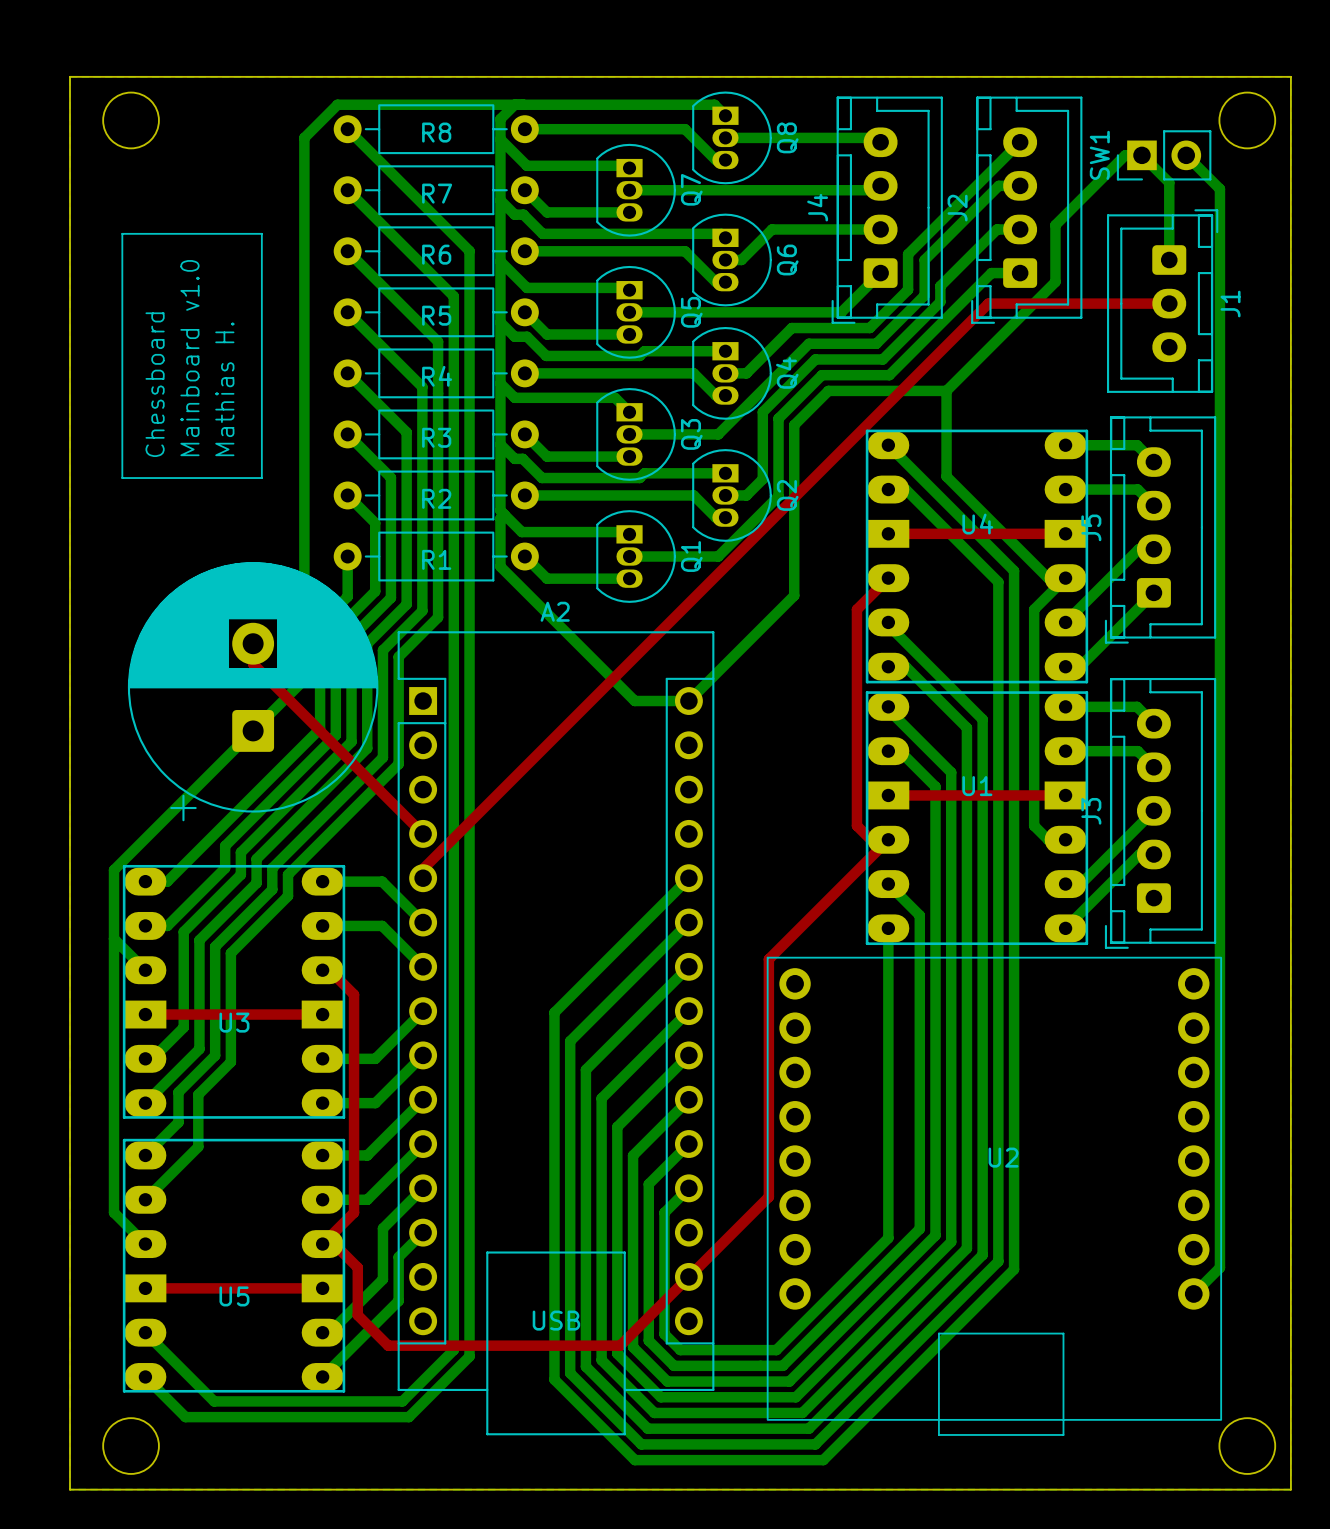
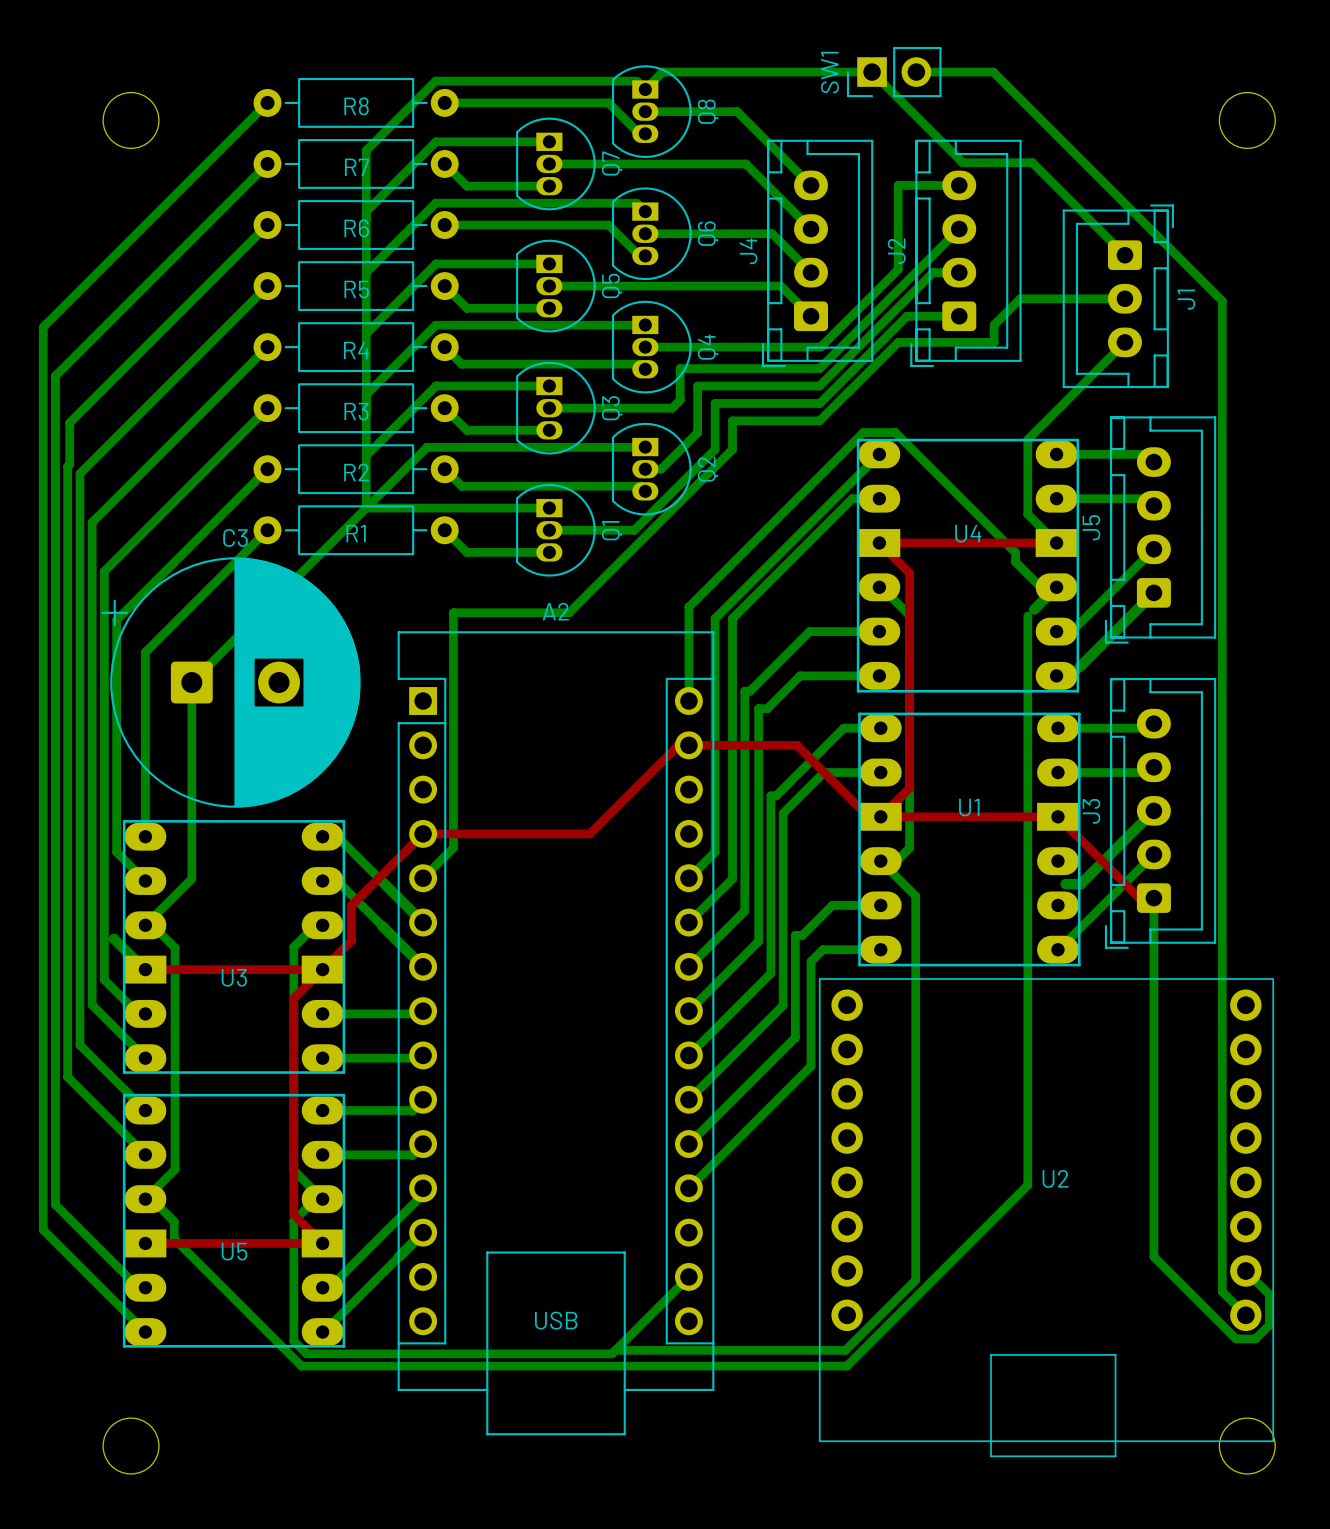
bottom track: none -> (872, 72) (962, 162) (1032, 162) (1124, 255)
bottom track: none -> (880, 72) (662, 72) (645, 89) (636, 81) (435, 81) (366, 150) (366, 333)
bottom track: none -> (916, 72) (993, 72) (1222, 300) (1222, 1291) (1245, 1315)
board edge: (70, 76) (1290, 76) (1290, 1489) (70, 1489) (70, 76) -> none
bottom track: none -> (444, 102) (608, 102) (639, 133) (645, 133)
bottom track: (514, 104) (500, 119) (500, 510) (521, 532) (627, 532) (629, 534) -> none
bottom track: none -> (645, 111) (737, 111) (811, 185)
bottom track: (725, 115) (714, 104) (337, 104) (304, 137) (304, 679) (114, 870) (114, 1212) (145, 1244) -> none
bottom track: (347, 129) (469, 251) (469, 1356) (408, 1417) (185, 1417) (145, 1376) -> none
R8 position: (436, 129) -> (356, 102)
bottom track: (524, 129) (685, 129) (715, 160) (725, 160) -> none
bottom track: (725, 137) (876, 137) (880, 142) -> none
Q8 position: (732, 137) -> (651, 111)
bottom track: (500, 139) (526, 165) (627, 165) (629, 168) -> none
bottom track: none -> (549, 141) (436, 141) (366, 211)
bottom track: (1020, 142) (908, 254) (908, 289) (869, 328) (791, 328) (746, 373) (725, 373) -> none
SW1 position: (1164, 155) -> (894, 72)
bottom track: (1186, 155) (1219, 189) (1219, 1267) (1193, 1293) -> none
bottom track: none -> (267, 163) (55, 375) (55, 1204) (138, 1287) (145, 1287)
bottom track: none -> (549, 163) (745, 163) (811, 229)
bottom track: (880, 185) (876, 190) (629, 190) -> none
bottom track: none -> (959, 185) (898, 185) (898, 269) (820, 347) (645, 347)
bottom track: (1020, 185) (998, 185) (924, 260) (924, 295) (876, 343) (808, 343) (718, 434) (629, 434) -> none
bottom track: (347, 190) (453, 296) (453, 1350) (402, 1401) (214, 1401) (145, 1332) -> (267, 102) (43, 327) (43, 1229) (145, 1332)
R7 position: (436, 190) -> (356, 163)
bottom track: (524, 190) (547, 212) (629, 212) -> (444, 163) (466, 186) (549, 186)
Q7 position: (636, 190) -> (555, 163)
bottom track: (500, 200) (514, 214) (523, 214) (542, 233) (721, 233) (725, 237) -> none
J4 position: (887, 210) -> (817, 253)
J2 position: (1026, 210) -> (965, 253)
bottom track: none -> (645, 211) (636, 203) (435, 203) (366, 272)
bottom track: none -> (444, 225) (608, 225) (639, 255) (645, 255)
bottom track: (880, 229) (772, 229) (741, 260) (725, 260) -> none
bottom track: none -> (959, 229) (819, 368) (680, 368) (680, 400) (672, 408) (549, 408)
bottom track: (1020, 229) (997, 229) (940, 286) (940, 302) (882, 359) (815, 359) (762, 412) (762, 479) (746, 495) (725, 495) -> none
line: (122, 233) (261, 233) (261, 478) (122, 478) (122, 233) -> none
bottom track: none -> (645, 233) (772, 233) (811, 272)
bottom track: (347, 251) (438, 341) (438, 617) (398, 656) (398, 764) (288, 874) (288, 896) (230, 953) (230, 1062) (198, 1094) (198, 1146) (145, 1199) (150, 1199) -> none
R6 position: (436, 251) -> (356, 225)
bottom track: (524, 251) (685, 251) (715, 282) (725, 282) -> none
Q6 position: (732, 260) -> (651, 233)
bottom track: (1169, 260) (1169, 182) (1141, 155) (1125, 155) (1055, 225) (1055, 281) (946, 390) -> none
bottom track: (500, 261) (526, 287) (627, 287) (629, 290) -> none
bottom track: none -> (549, 263) (436, 263) (366, 333) (366, 508) (549, 508)
bottom track: none -> (959, 272) (933, 272) (819, 386) (697, 386) (697, 432) (661, 469) (645, 469)
bottom track: (880, 273) (841, 312) (629, 312) -> none
bottom track: (1020, 273) (991, 273) (889, 375) (821, 375) (778, 418) (778, 496) (718, 556) (629, 556) -> none
bottom track: none -> (267, 286) (79, 473) (79, 1045) (145, 1110)
bottom track: none -> (549, 286) (780, 286) (811, 316)
bottom track: none -> (1124, 298) (1020, 298) (994, 324) (994, 342) (898, 342) (819, 420) (732, 420) (732, 449) (569, 612) (453, 612) (453, 847) (423, 878)
J1 position: (1162, 301) -> (1118, 296)
top track: (1169, 303) (988, 303) (423, 868) (423, 878) -> none
bottom track: (347, 312) (422, 387) (422, 610) (382, 650) (382, 757) (272, 868) (272, 889) (215, 946) (215, 1055) (178, 1092) (178, 1122) (145, 1155) -> (267, 225) (69, 422) (69, 464) (67, 466) (67, 1077) (145, 1154)
R5 position: (436, 312) -> (356, 286)
bottom track: (524, 312) (547, 334) (629, 334) -> (444, 286) (466, 308) (549, 308)
Q5 position: (636, 312) -> (555, 286)
bottom track: none -> (959, 316) (906, 316) (819, 403) (715, 403) (715, 449) (634, 530) (549, 530)
bottom track: (500, 322) (514, 336) (527, 336) (546, 355) (639, 355) (644, 351) (725, 351) -> none
bottom track: none -> (645, 324) (435, 325) (366, 394)
bottom track: none -> (1124, 342) (1027, 439) (1027, 514) (1056, 542)
bottom track: none -> (444, 347) (461, 364) (640, 364) (645, 369)
text: Mainboard v1.0 (189, 358) -> none
bottom track: (347, 373) (406, 432) (406, 604) (367, 643) (367, 748) (256, 859) (256, 883) (199, 940) (199, 1049) (145, 1103) -> none
R4 position: (436, 373) -> (356, 347)
bottom track: (524, 373) (693, 373) (715, 395) (725, 395) -> none
Q4 position: (732, 373) -> (651, 347)
bottom track: (500, 383) (514, 397) (615, 397) (629, 412) -> none
text: Chessboard (155, 384) -> none
bottom track: none -> (549, 386) (436, 386) (366, 455)
text: Mathias H. (224, 389) -> none
bottom track: (946, 390) (828, 390) (794, 425) (794, 595) (688, 701) (634, 701) (500, 566) (500, 518) (504, 514) -> none
bottom track: (946, 390) (946, 476) (1048, 578) (1065, 578) -> none
bottom track: none -> (267, 408) (104, 571) (104, 979) (138, 1013) (145, 1013)
bottom track: (347, 434) (390, 477) (390, 597) (351, 637) (351, 741) (240, 852) (240, 874) (183, 931) (183, 1027) (152, 1058) (145, 1058) -> (267, 347) (92, 522) (92, 1004) (145, 1058)
R3 position: (436, 434) -> (356, 408)
bottom track: (524, 434) (547, 456) (629, 456) -> (444, 408) (466, 430) (549, 430)
Q3 position: (636, 434) -> (555, 408)
bottom track: (500, 444) (514, 458) (522, 458) (541, 478) (639, 478) (644, 473) (725, 473) -> none
bottom track: (888, 445) (1014, 570) (1014, 1269) (823, 1460) (634, 1460) (554, 1379) (554, 1012) (688, 878) -> (879, 454) (715, 618) (715, 852) (688, 878)
bottom track: (1065, 445) (1137, 445) (1146, 454) -> (1056, 454) (1146, 454)
bottom track: none -> (645, 447) (426, 447) (191, 682) (191, 878) (145, 925) (152, 925) (175, 947) (175, 1169) (145, 1199) (151, 1199) (174, 1221) (174, 1238) (301, 1366) (846, 1366) (1027, 1185) (1027, 616)
bottom track: none -> (444, 469) (461, 486) (640, 486) (645, 491)
bottom track: (888, 489) (905, 489) (998, 582) (998, 1261) (815, 1444) (641, 1444) (570, 1373) (570, 1041) (688, 922) -> (879, 498) (852, 498) (732, 618) (732, 878) (688, 922)
bottom track: (1065, 489) (1137, 489) (1146, 498) -> (1056, 498) (1146, 498)
bottom track: (347, 495) (375, 523) (375, 591) (335, 630) (335, 735) (225, 846) (225, 868) (167, 925) (145, 925) -> none
R2 position: (436, 495) -> (356, 469)
bottom track: (524, 495) (693, 495) (715, 517) (725, 517) -> none
Q2 position: (732, 495) -> (651, 469)
bottom track: none -> (267, 530) (145, 652) (145, 836)
top track: (888, 533) (1065, 533) -> none
top track: none -> (1056, 542) (879, 542) (909, 573) (909, 788) (880, 816)
bottom track: (1153, 549) (1138, 549) (1065, 622) -> (1153, 549) (1071, 631) (1056, 631)
bottom track: (347, 556) (347, 596) (320, 624) (320, 728) (167, 881) (145, 881) -> (267, 469) (116, 620) (116, 852) (145, 881)
R1 position: (436, 556) -> (356, 530)
bottom track: (524, 556) (547, 578) (629, 578) -> (444, 530) (466, 552) (549, 552)
Q1 position: (636, 556) -> (555, 530)
U4 position: (976, 556) -> (967, 565)
top track: (888, 578) (856, 609) (856, 825) (870, 839) (888, 839) (768, 959) (768, 1196) (620, 1345) (388, 1345) (357, 1315) (357, 1267) (334, 1244) (322, 1244) (354, 1212) (354, 994) (329, 970) (322, 970) -> (145, 969) (322, 969)
bottom track: none -> (879, 587) (909, 615) (909, 848) (896, 861) (880, 861) (915, 896) (915, 1280) (845, 1350) (615, 1350)
bottom track: none -> (1056, 587) (1040, 587) (1015, 561) (1015, 552) (895, 432) (863, 432) (688, 607) (688, 701)
bottom track: (1034, 609) (1034, 825) (1048, 839) (1065, 839) -> none
bottom track: (888, 622) (888, 625) (982, 719) (982, 1254) (808, 1428) (647, 1428) (585, 1366) (585, 1069) (688, 966) -> (879, 631) (809, 631) (749, 691) (744, 691) (744, 910) (688, 966)
top track: (253, 643) (253, 663) (423, 833) -> none
bottom track: (888, 666) (905, 666) (966, 727) (966, 1248) (802, 1412) (654, 1412) (601, 1360) (601, 1098) (688, 1011) -> (879, 675) (800, 675) (767, 708) (758, 708) (758, 941) (688, 1011)
C3: none -> (231, 682)
part: (253, 691) -> none
bottom track: (888, 706) (888, 709) (951, 772) (951, 1241) (795, 1397) (660, 1397) (617, 1353) (617, 1127) (688, 1055) -> (880, 728) (843, 728) (776, 795) (770, 795) (770, 973) (688, 1055)
bottom track: (1065, 706) (1137, 706) (1153, 723) -> (1057, 728) (1149, 728) (1153, 723)
bottom track: (888, 751) (899, 751) (935, 786) (935, 1235) (789, 1381) (667, 1381) (633, 1347) (633, 1155) (688, 1099) -> (880, 772) (823, 772) (783, 813) (783, 1005) (688, 1099)
bottom track: (1065, 751) (1137, 751) (1153, 767) -> (1057, 772) (1148, 772) (1153, 767)
top track: (888, 795) (1065, 795) -> none
U1 position: (976, 818) -> (969, 839)
bottom track: (1153, 854) (1139, 854) (1065, 928) -> (1153, 854) (1057, 949)
bottom track: (322, 881) (382, 881) -> (322, 836) (337, 836) (382, 881)
bottom track: (888, 884) (919, 915) (919, 1228) (782, 1365) (673, 1365) (648, 1340) (648, 1184) (688, 1144) -> (880, 905) (832, 905) (802, 935) (795, 935) (795, 1037) (688, 1144)
bottom track: none -> (1153, 898) (1153, 1256) (1236, 1338) (1255, 1338) (1269, 1325) (1269, 1294) (1245, 1271)
top track: none -> (1153, 898) (1139, 898) (1057, 816) (868, 816) (797, 745) (678, 745) (589, 833) (423, 833) (351, 905) (351, 940) (293, 998) (293, 1214) (322, 1243) (145, 1243)
bottom track: (322, 925) (382, 925) -> (322, 881) (337, 881) (382, 925)
bottom track: none -> (322, 925) (315, 925) (293, 947) (293, 1170) (322, 1199) (315, 1199) (293, 1220) (293, 1341) (306, 1353) (611, 1353) (688, 1276)
bottom track: (888, 928) (888, 1238) (776, 1350) (680, 1350) (664, 1334) (664, 1212) (688, 1188) -> (880, 949) (822, 949) (811, 961) (811, 1066) (688, 1188)
U3 position: (234, 991) -> (234, 946)
bottom track: (420, 1013) (375, 1058) (322, 1058) -> (420, 1013) (322, 1013)
top track: (145, 1014) (322, 1014) -> none
bottom track: (420, 1058) (375, 1103) (322, 1103) -> (420, 1058) (322, 1058)
bottom track: (412, 1110) (367, 1155) (322, 1155) -> (412, 1110) (322, 1110)
bottom track: (412, 1154) (367, 1199) (322, 1199) -> (412, 1154) (322, 1154)
bottom track: (423, 1188) (382, 1228) (382, 1279) (329, 1332) (322, 1332) -> (423, 1188) (423, 1194) (329, 1287) (322, 1287)
U2 position: (994, 1196) -> (1046, 1217)
bottom track: (398, 1257) (398, 1300) (322, 1376) -> (398, 1257) (322, 1332)
U5 position: (234, 1265) -> (234, 1220)
top track: (145, 1288) (322, 1288) -> none

